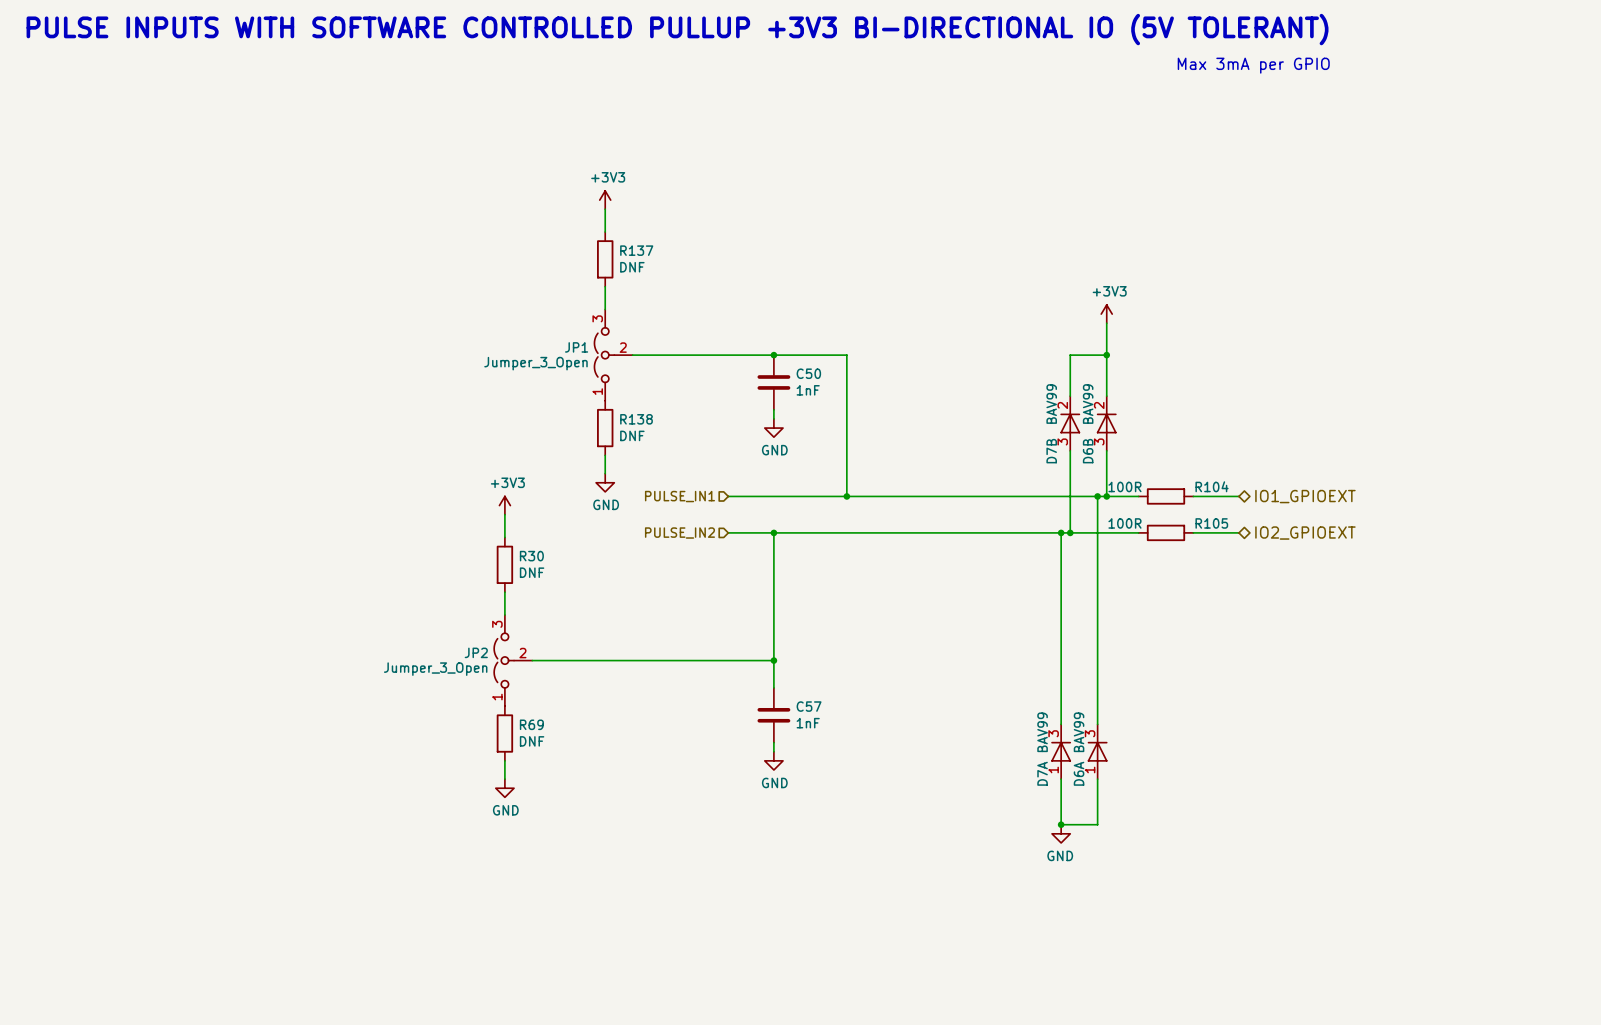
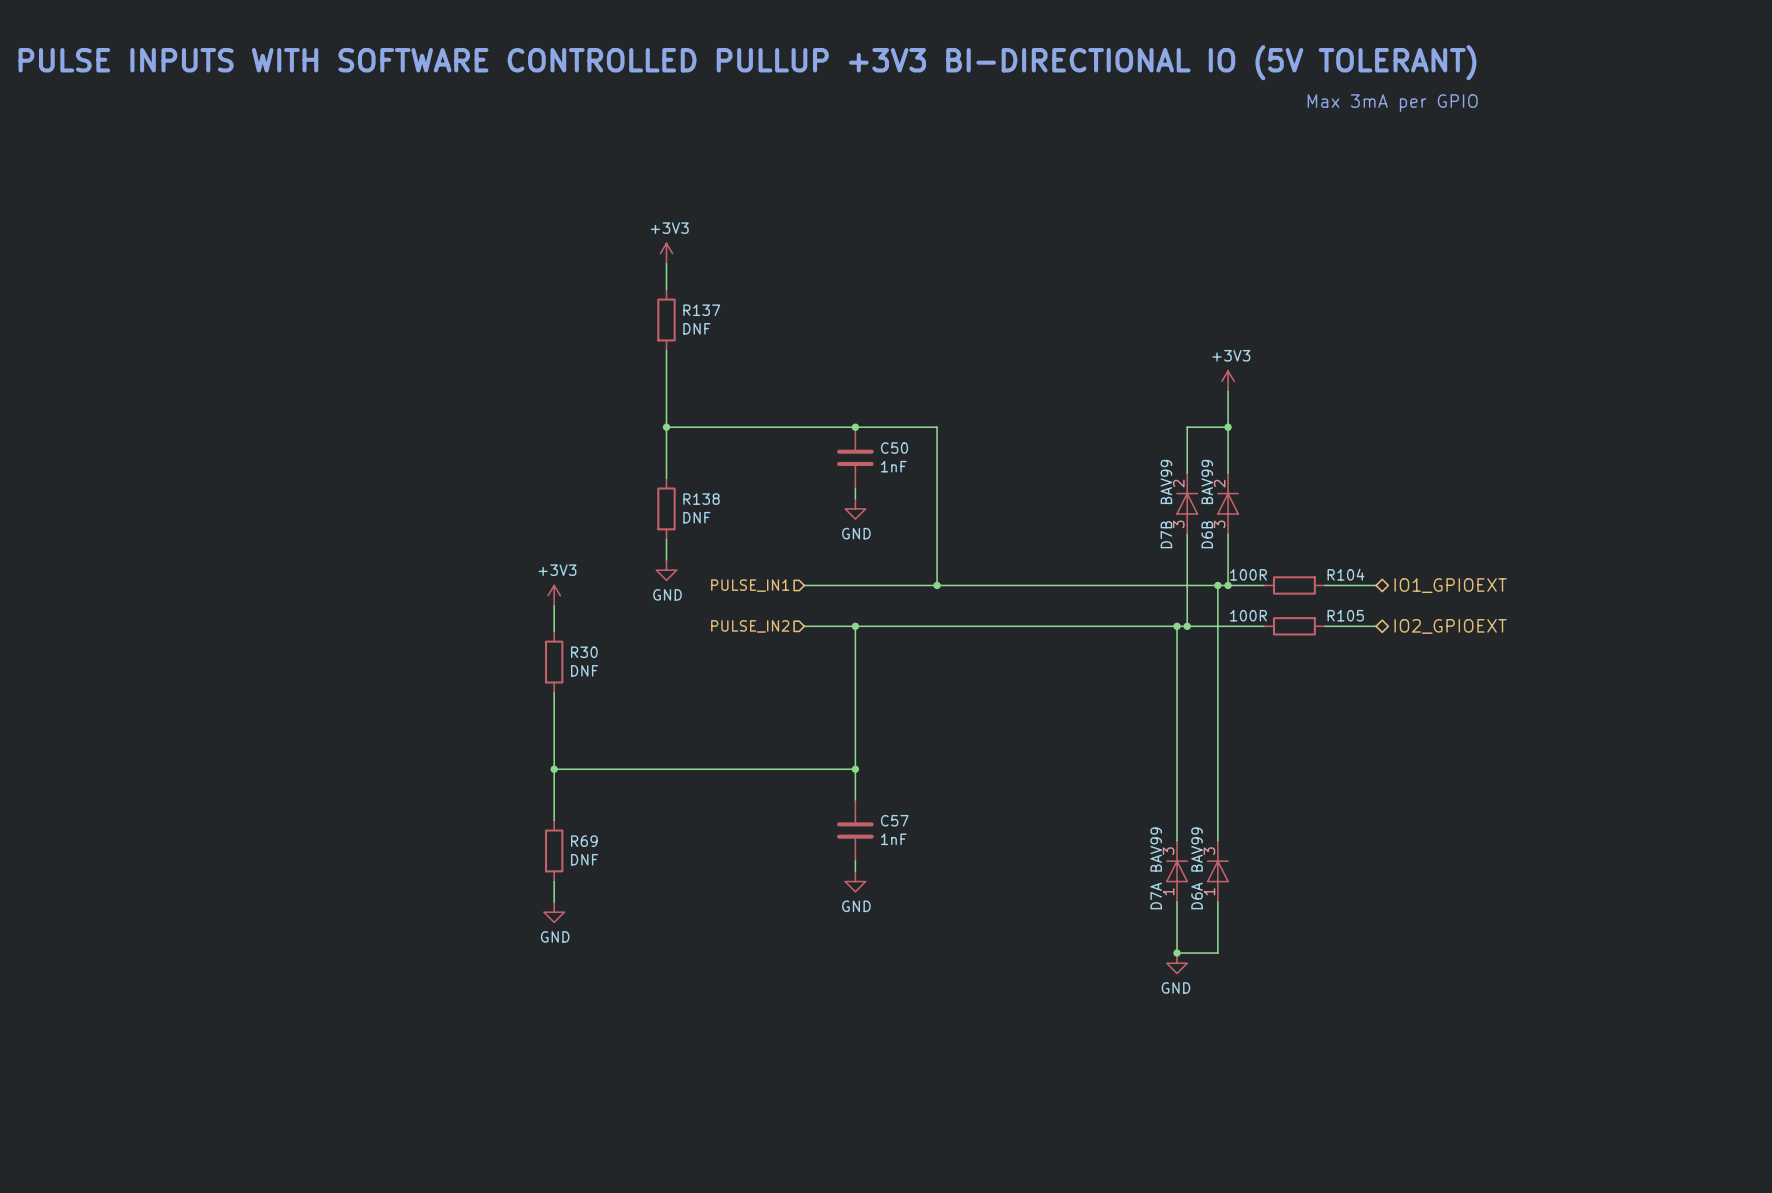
wire: none -> (666, 376) (666, 478)
junction: none -> (666, 427)
JP1: Jumper_3_Open (613, 355) -> none
wire: none -> (554, 718) (554, 820)
junction: none -> (554, 769)
JP2: Jumper_3_Open (513, 660) -> none

